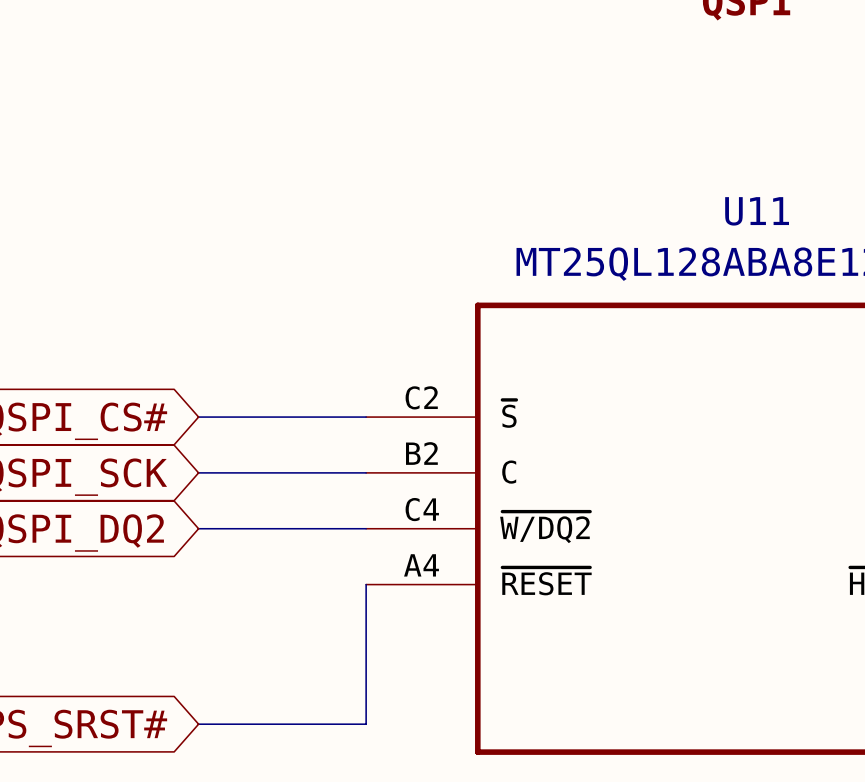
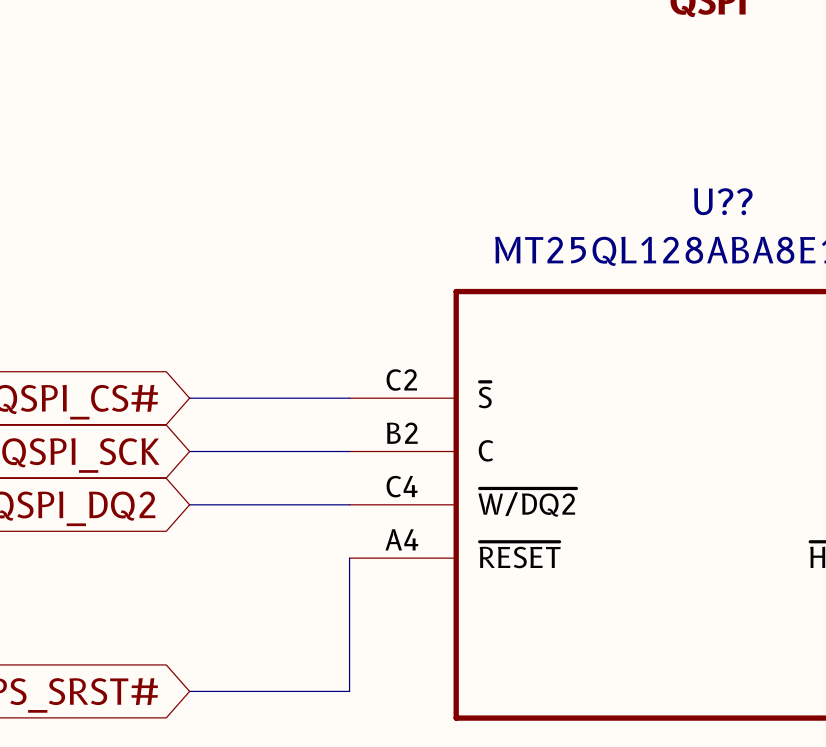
U11 name: U11 (757, 211) -> U?? (723, 201)

